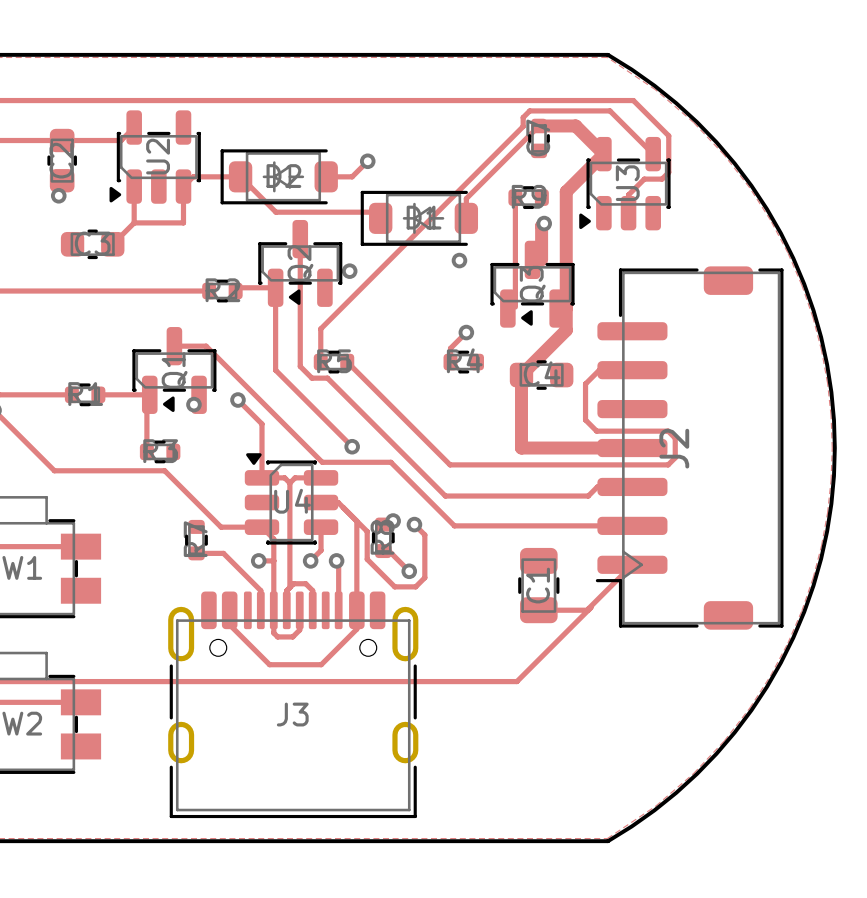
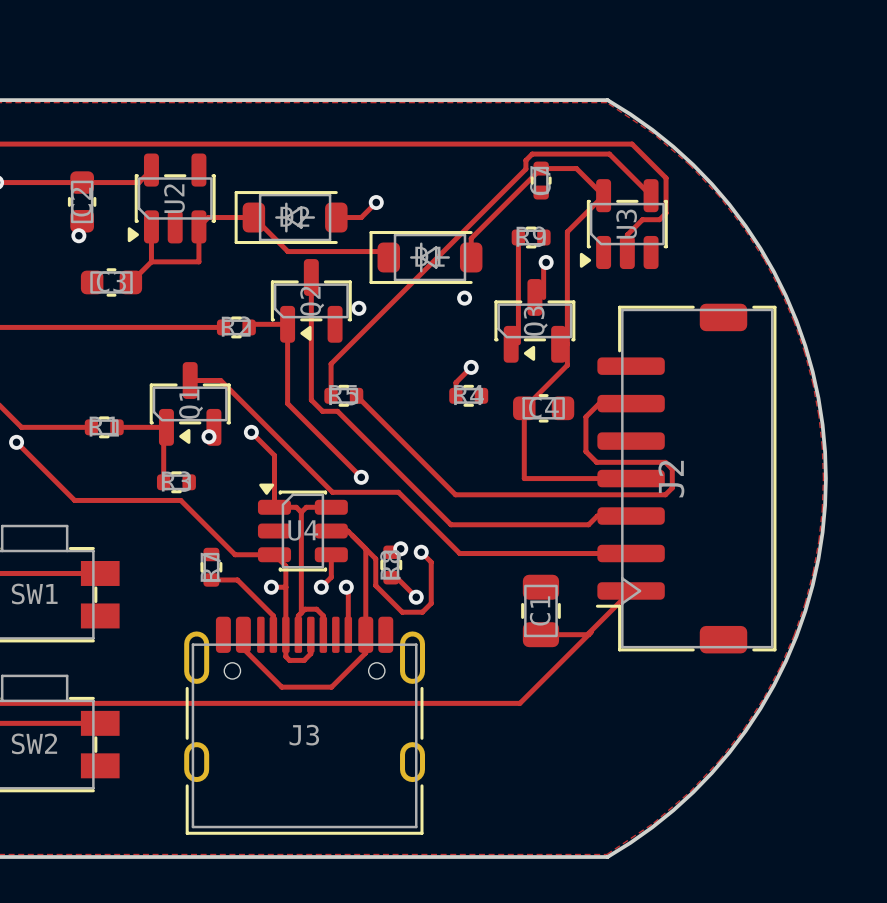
track width: thick (539, 125) (575, 125) (603, 154) (566, 191) (566, 330) (521, 375) (521, 448) (632, 448) -> thin (541, 168) (576, 168) (603, 195) (567, 231) (567, 365) (524, 408) (524, 478) (631, 478)
track width: thick (544, 223) (541, 226) (541, 259) -> thin (546, 262) (543, 264) (543, 297)

